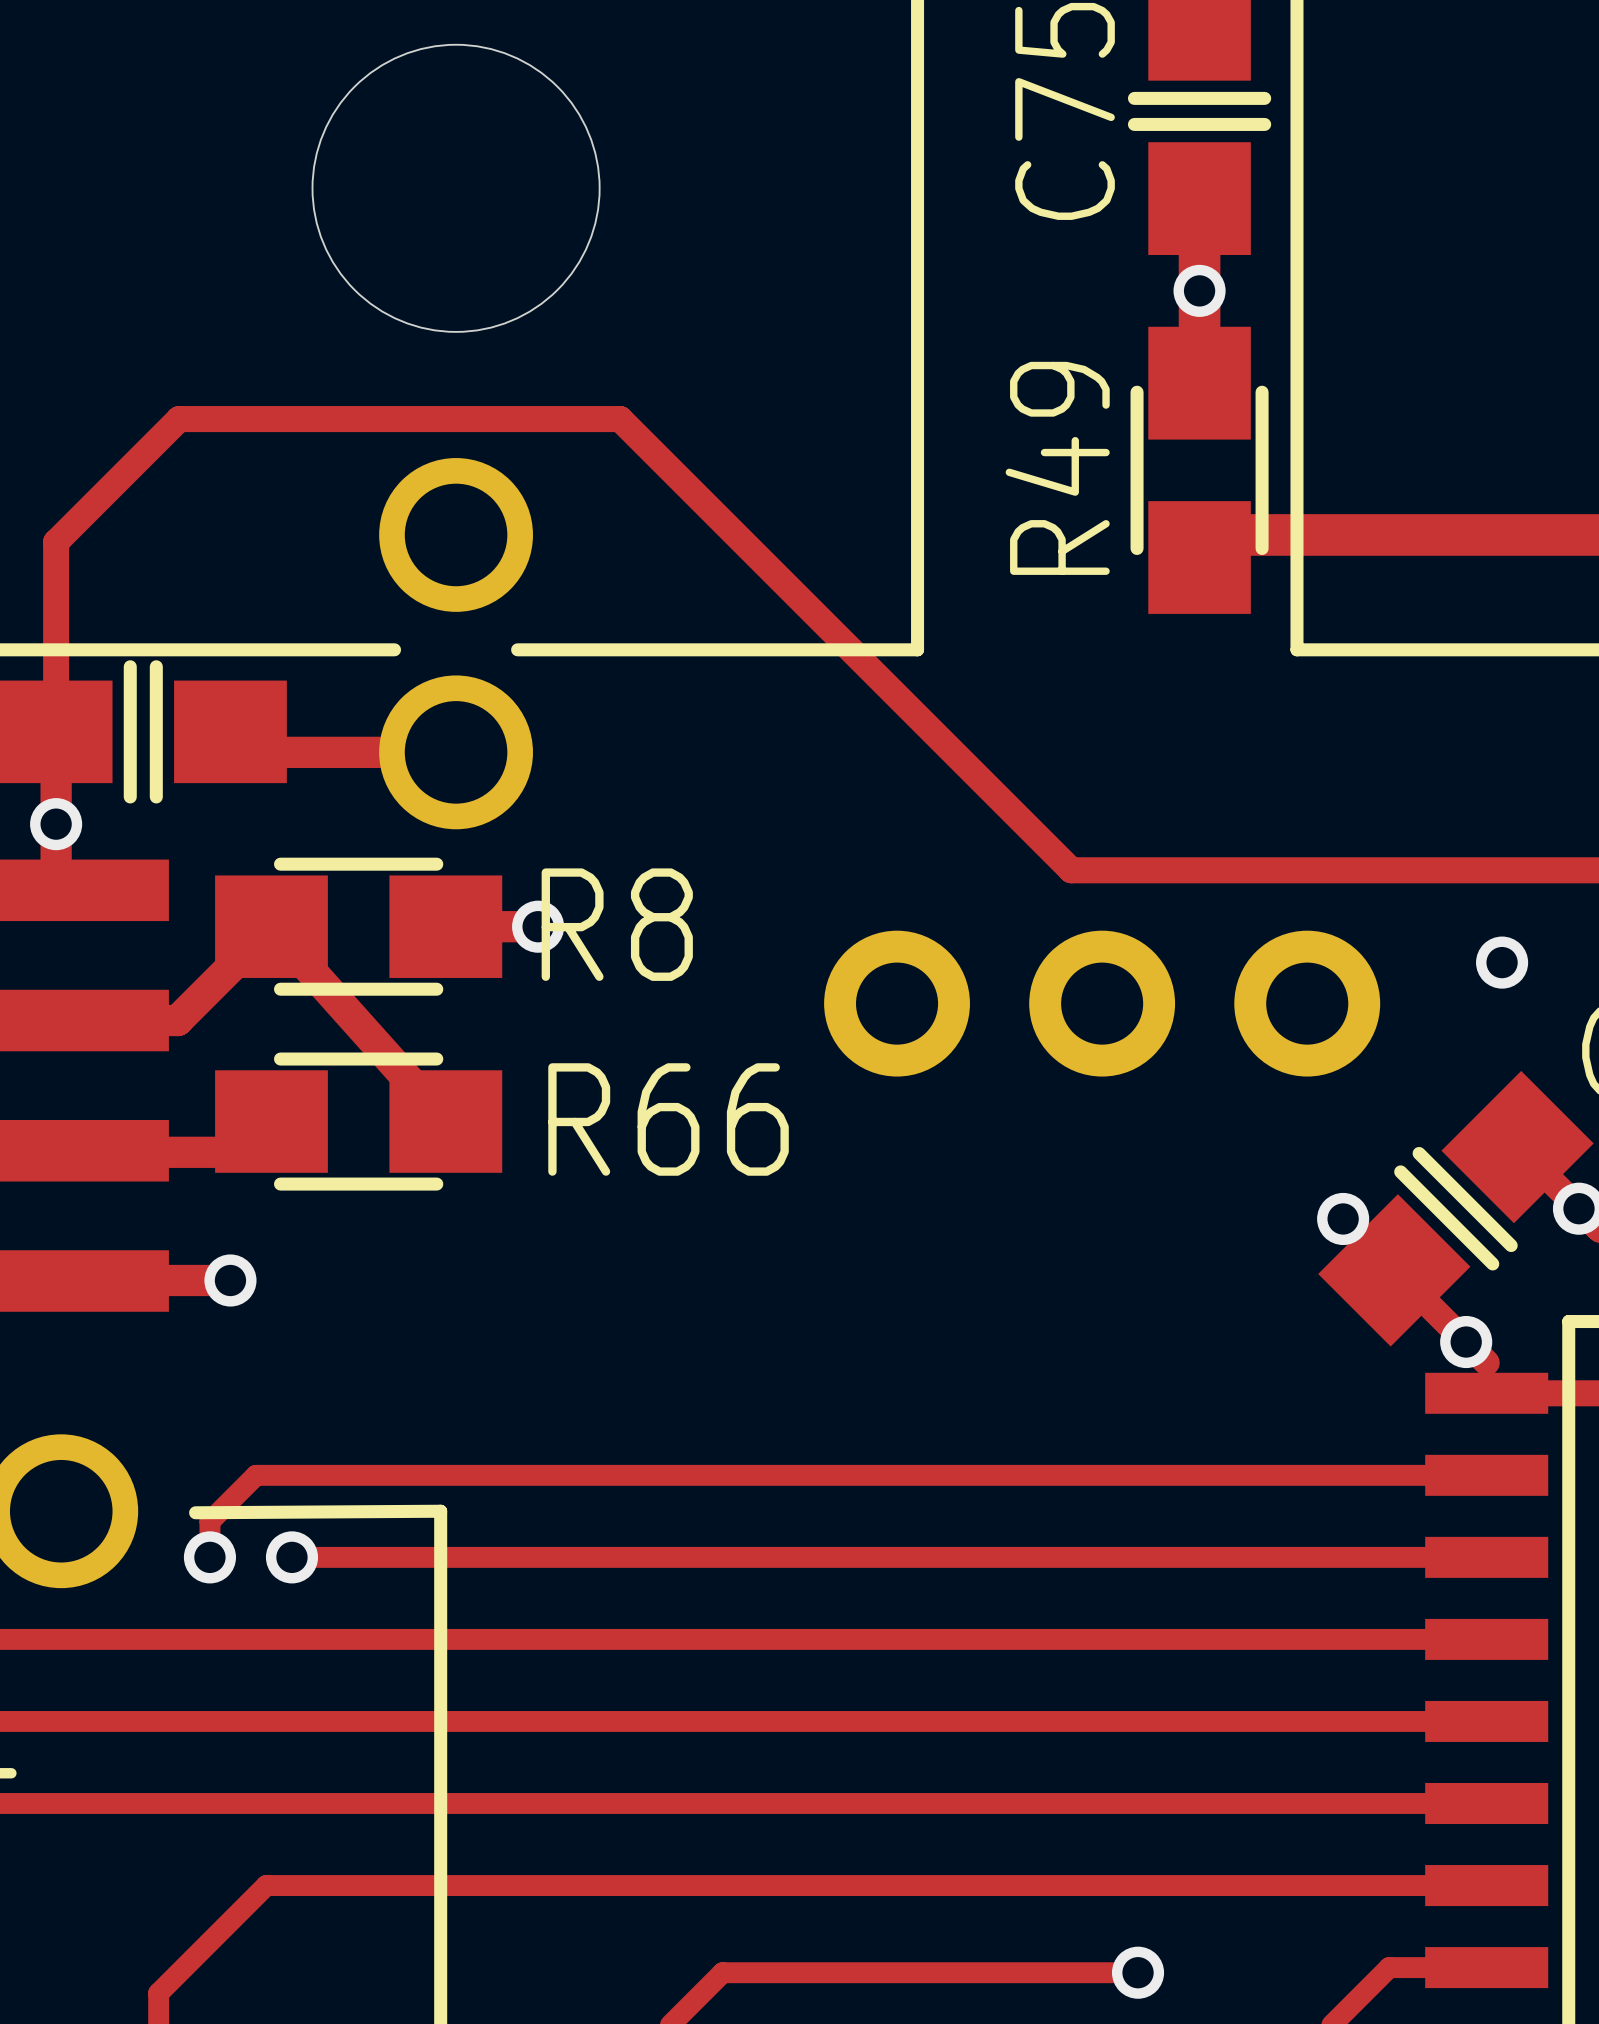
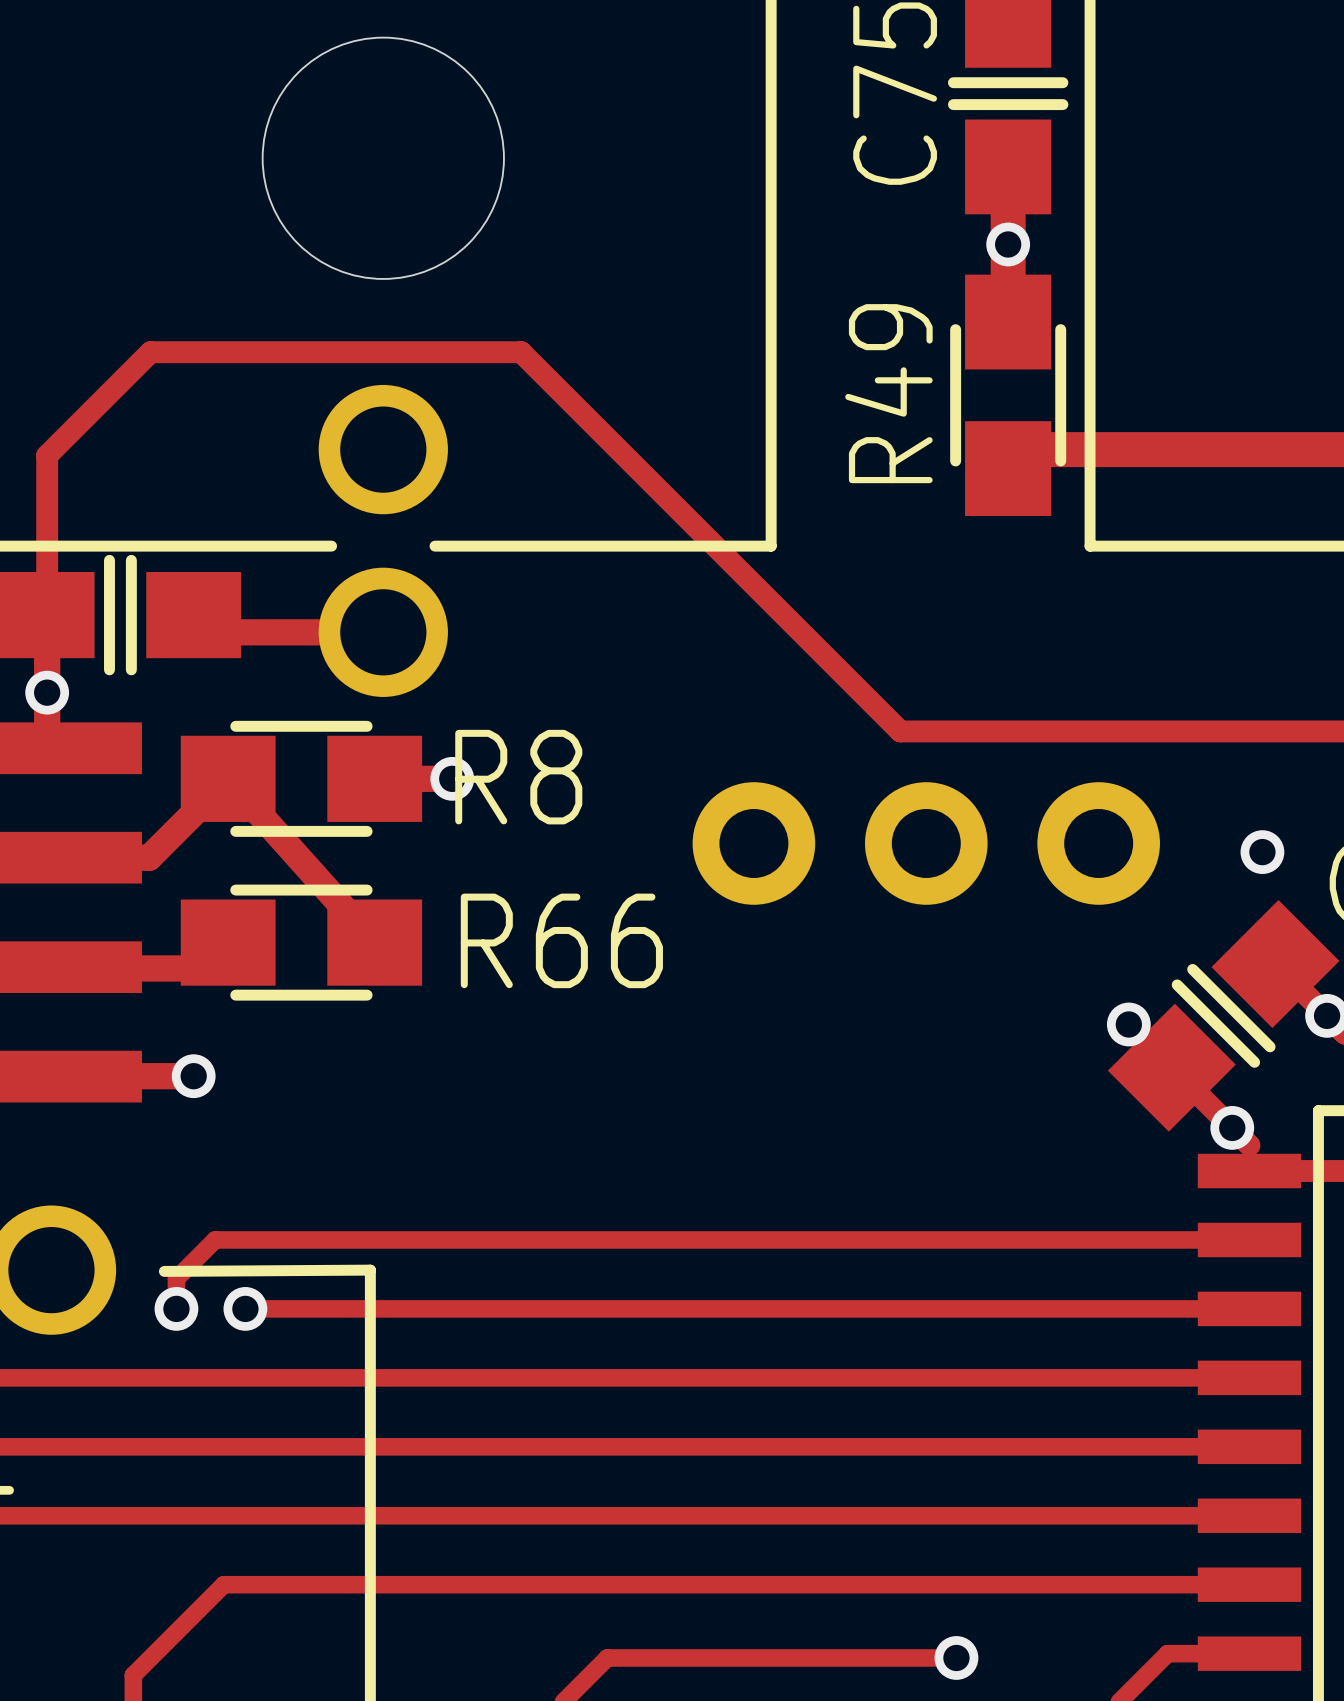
via position: (1502, 962) -> (1262, 852)

